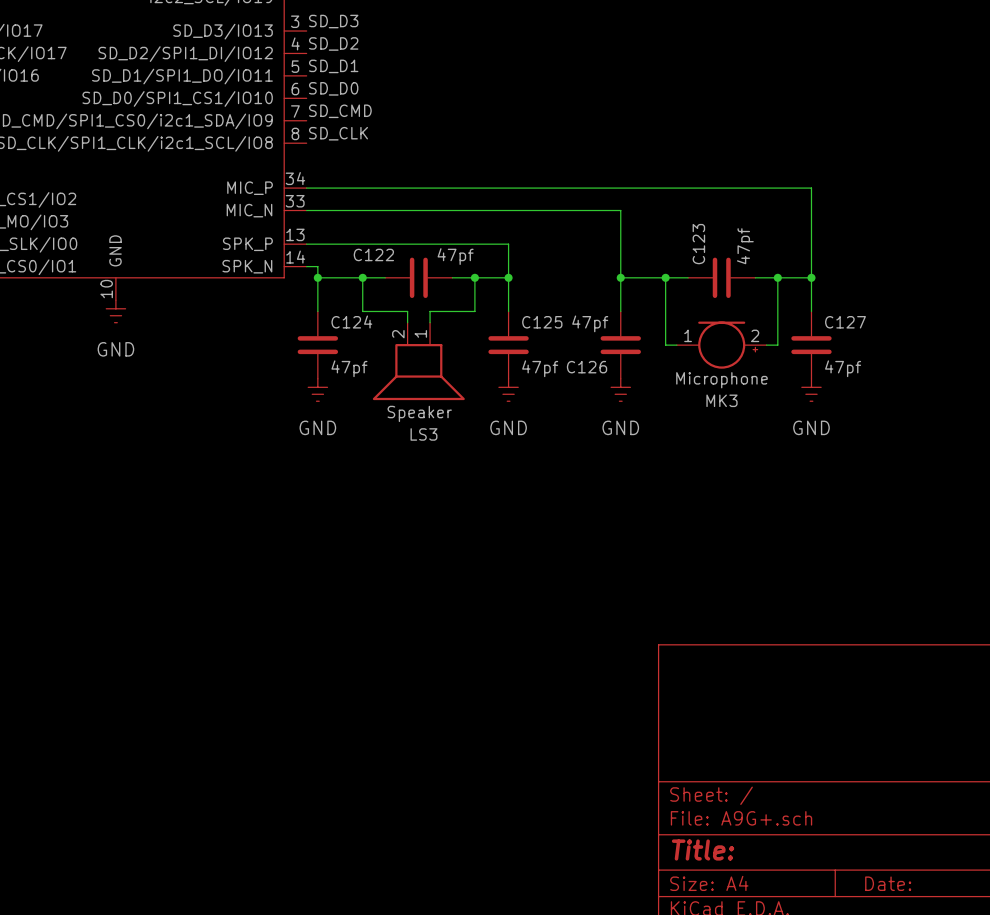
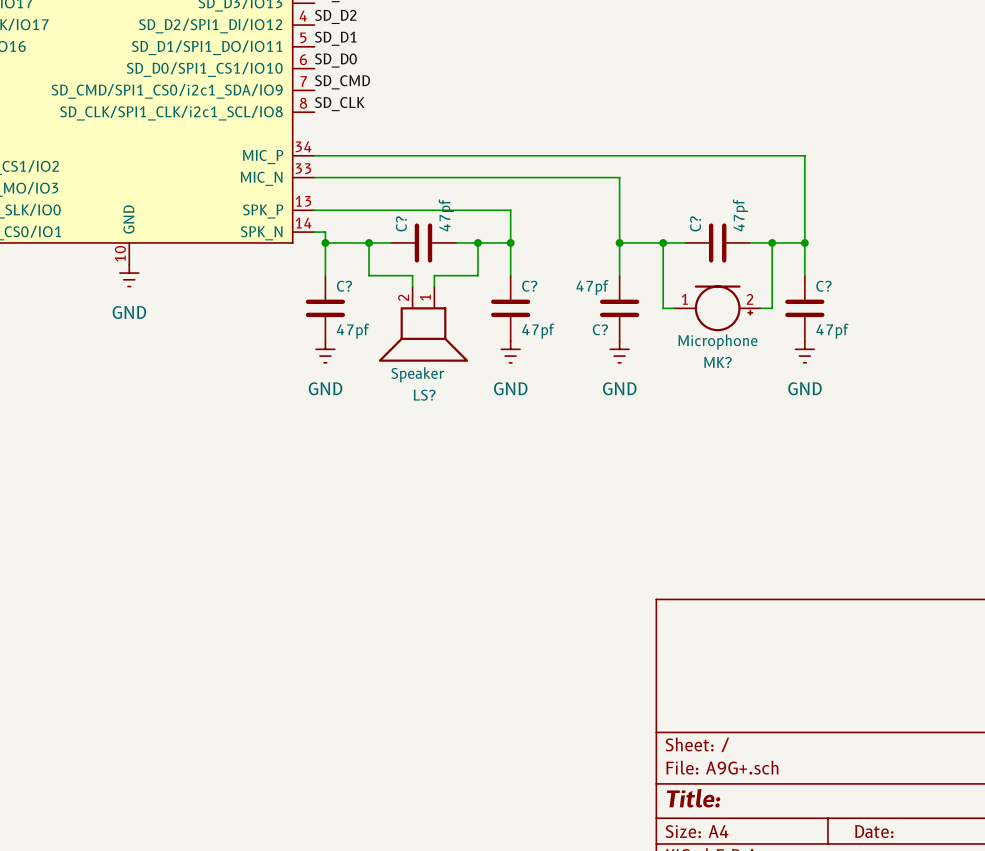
C123 name: C123 (698, 244) -> C? (695, 223)
C122 name: C122 (373, 254) -> C? (401, 223)
C122 value rotation: 0° (455, 256) -> 90° counterclockwise (446, 215)
C124 name: C124 (351, 322) -> C? (344, 286)
C125 name: C125 (542, 322) -> C? (529, 286)
C127 name: C127 (845, 322) -> C? (823, 286)
C126 name: C126 (587, 367) -> C? (600, 329)
MK3 name: MK3 (721, 400) -> MK? (717, 362)
LS3 name: LS3 (423, 434) -> LS? (424, 395)

